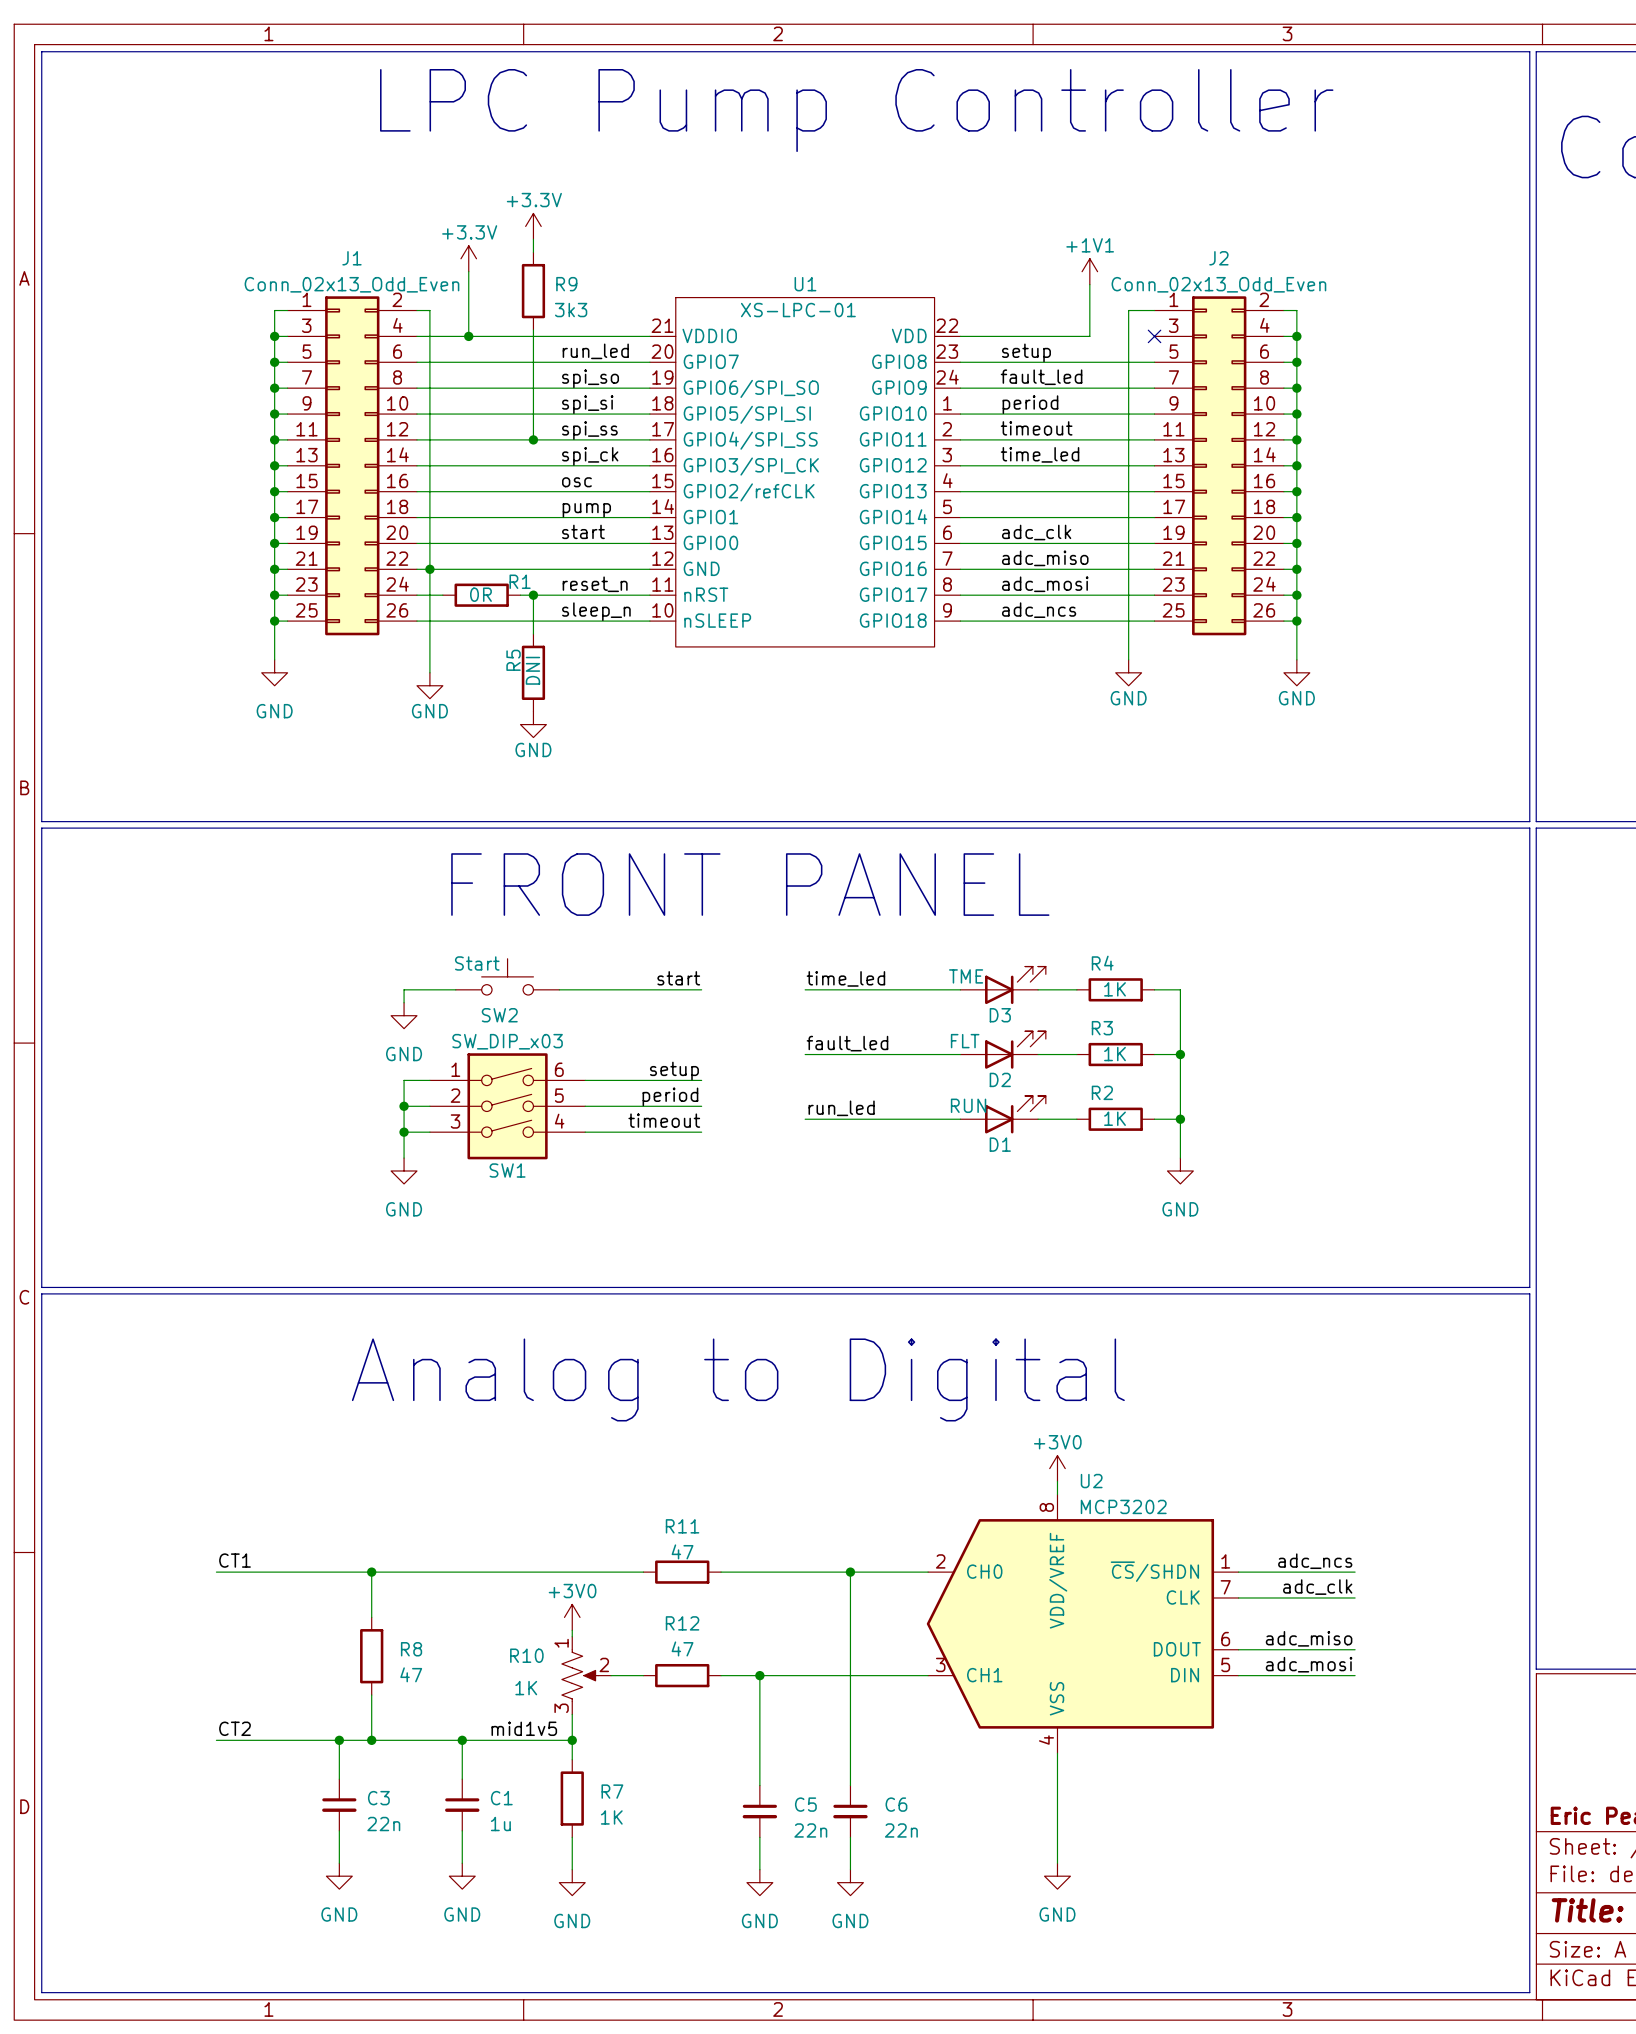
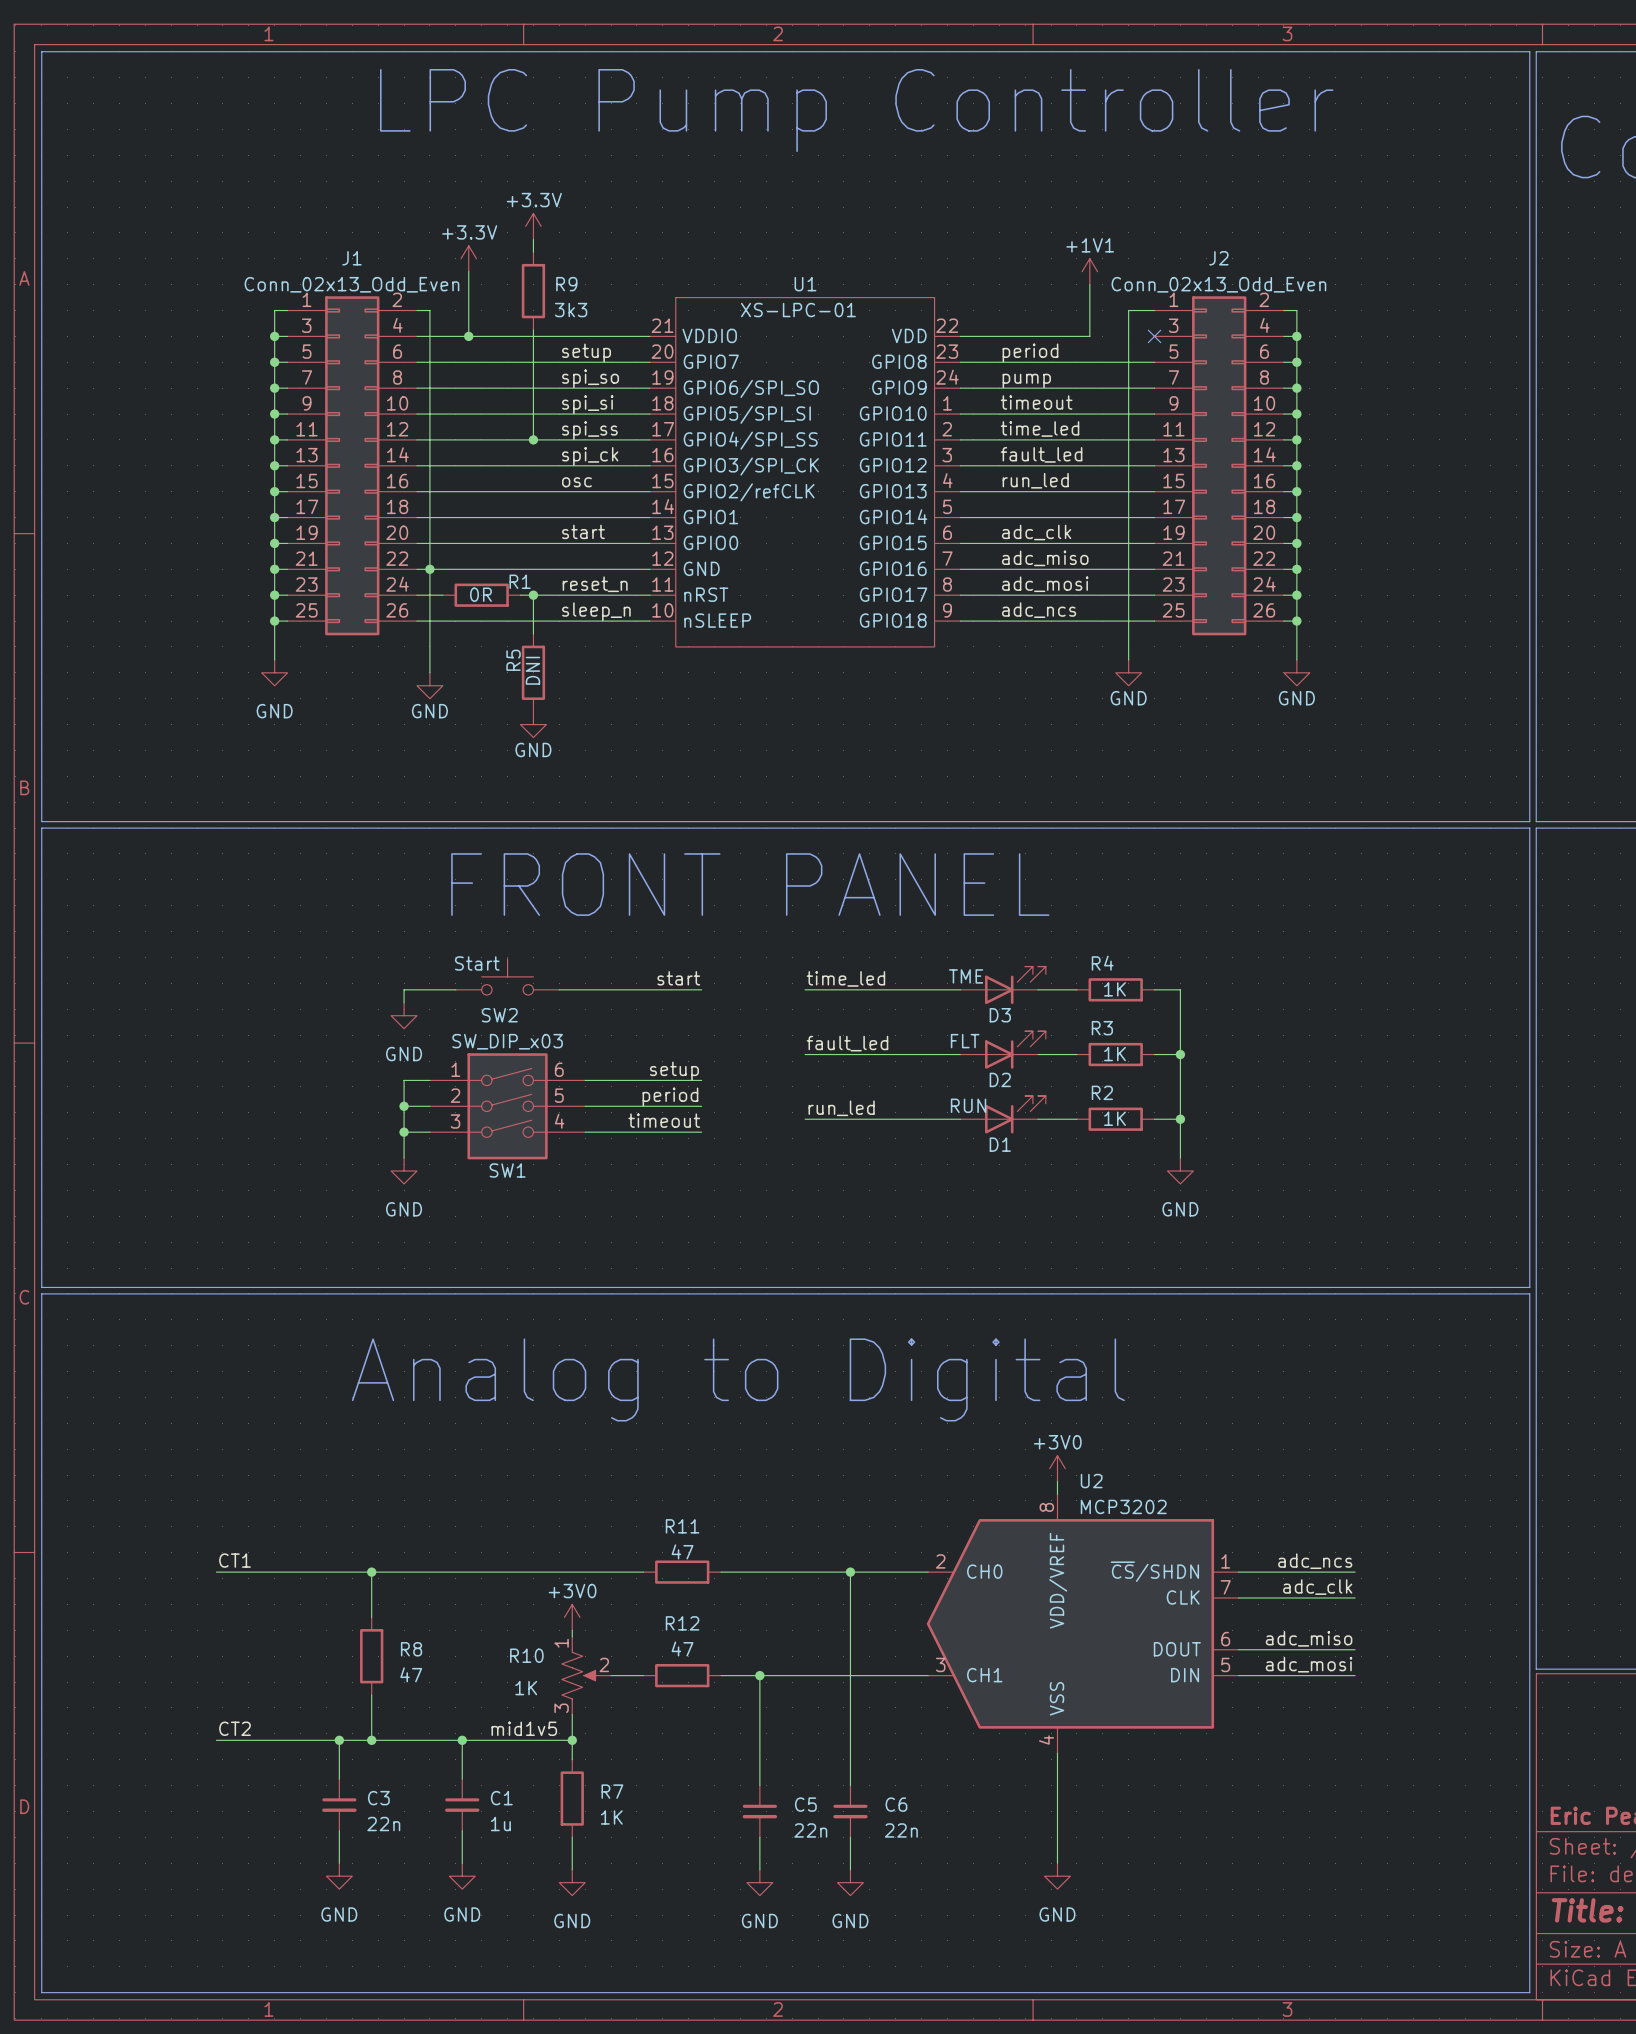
label: run_led (595, 351) -> setup (586, 352)
label: setup (1026, 352) -> period (1030, 352)
label: fault_led (1041, 377) -> pump (1026, 380)
label: period (1030, 404) -> timeout (1036, 402)
label: timeout (1036, 428) -> time_led (1040, 428)
label: time_led (1040, 454) -> fault_led (1041, 454)
label: none -> run_led (1035, 480)
label: pump (586, 510) -> none

